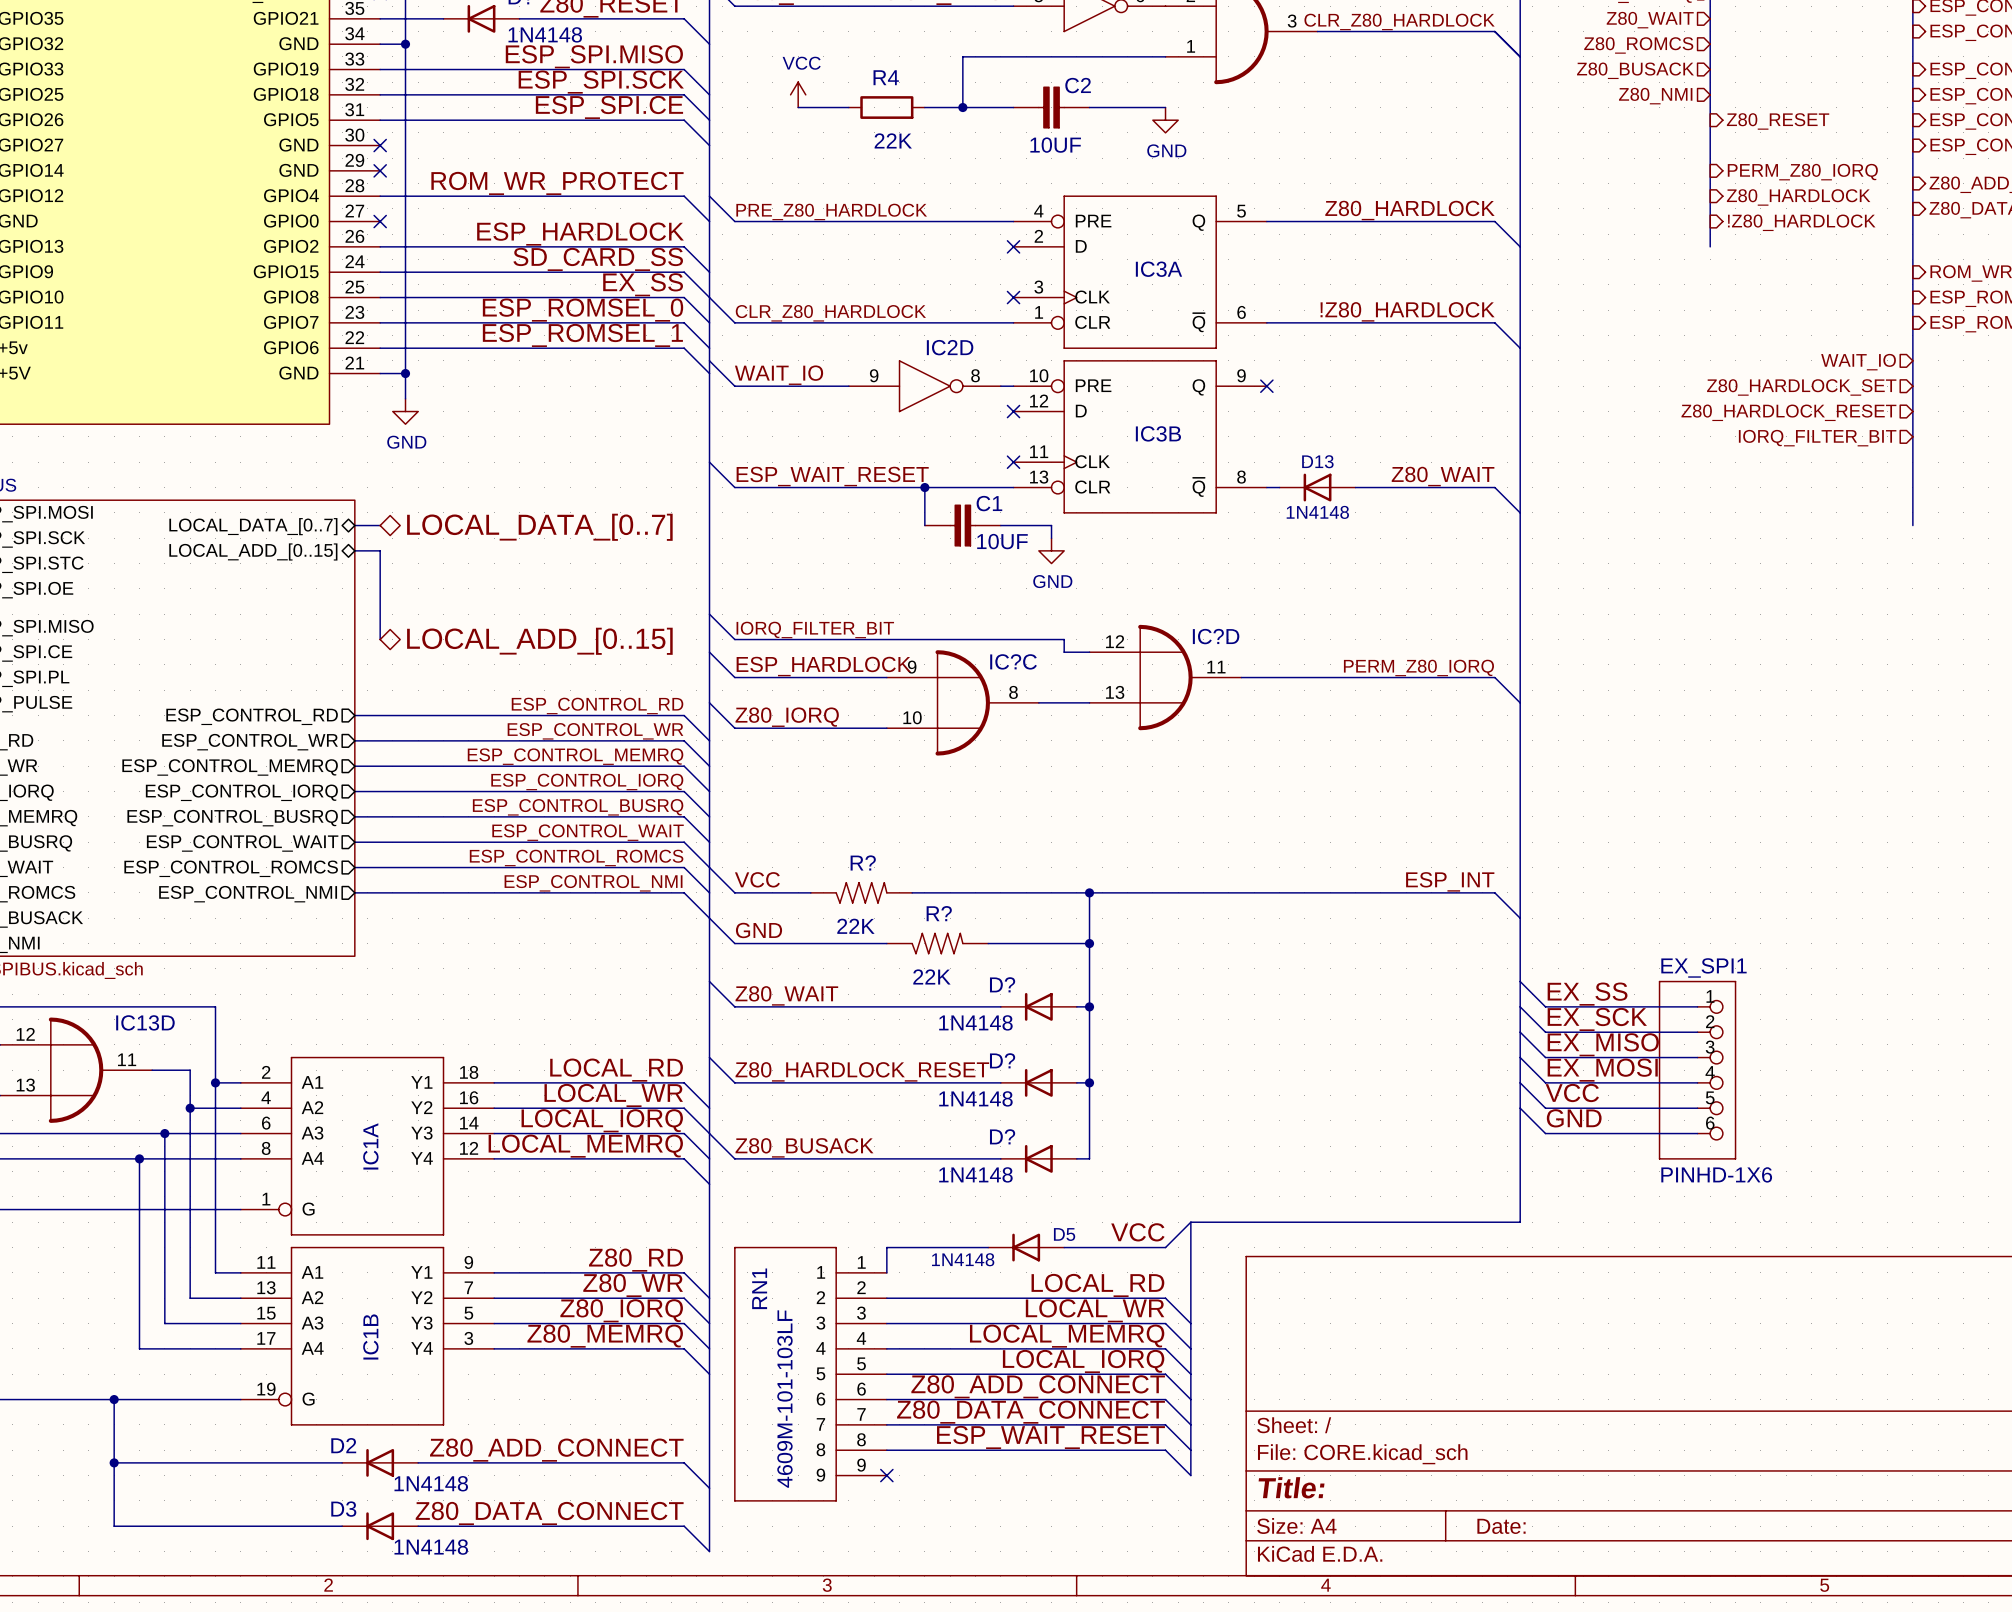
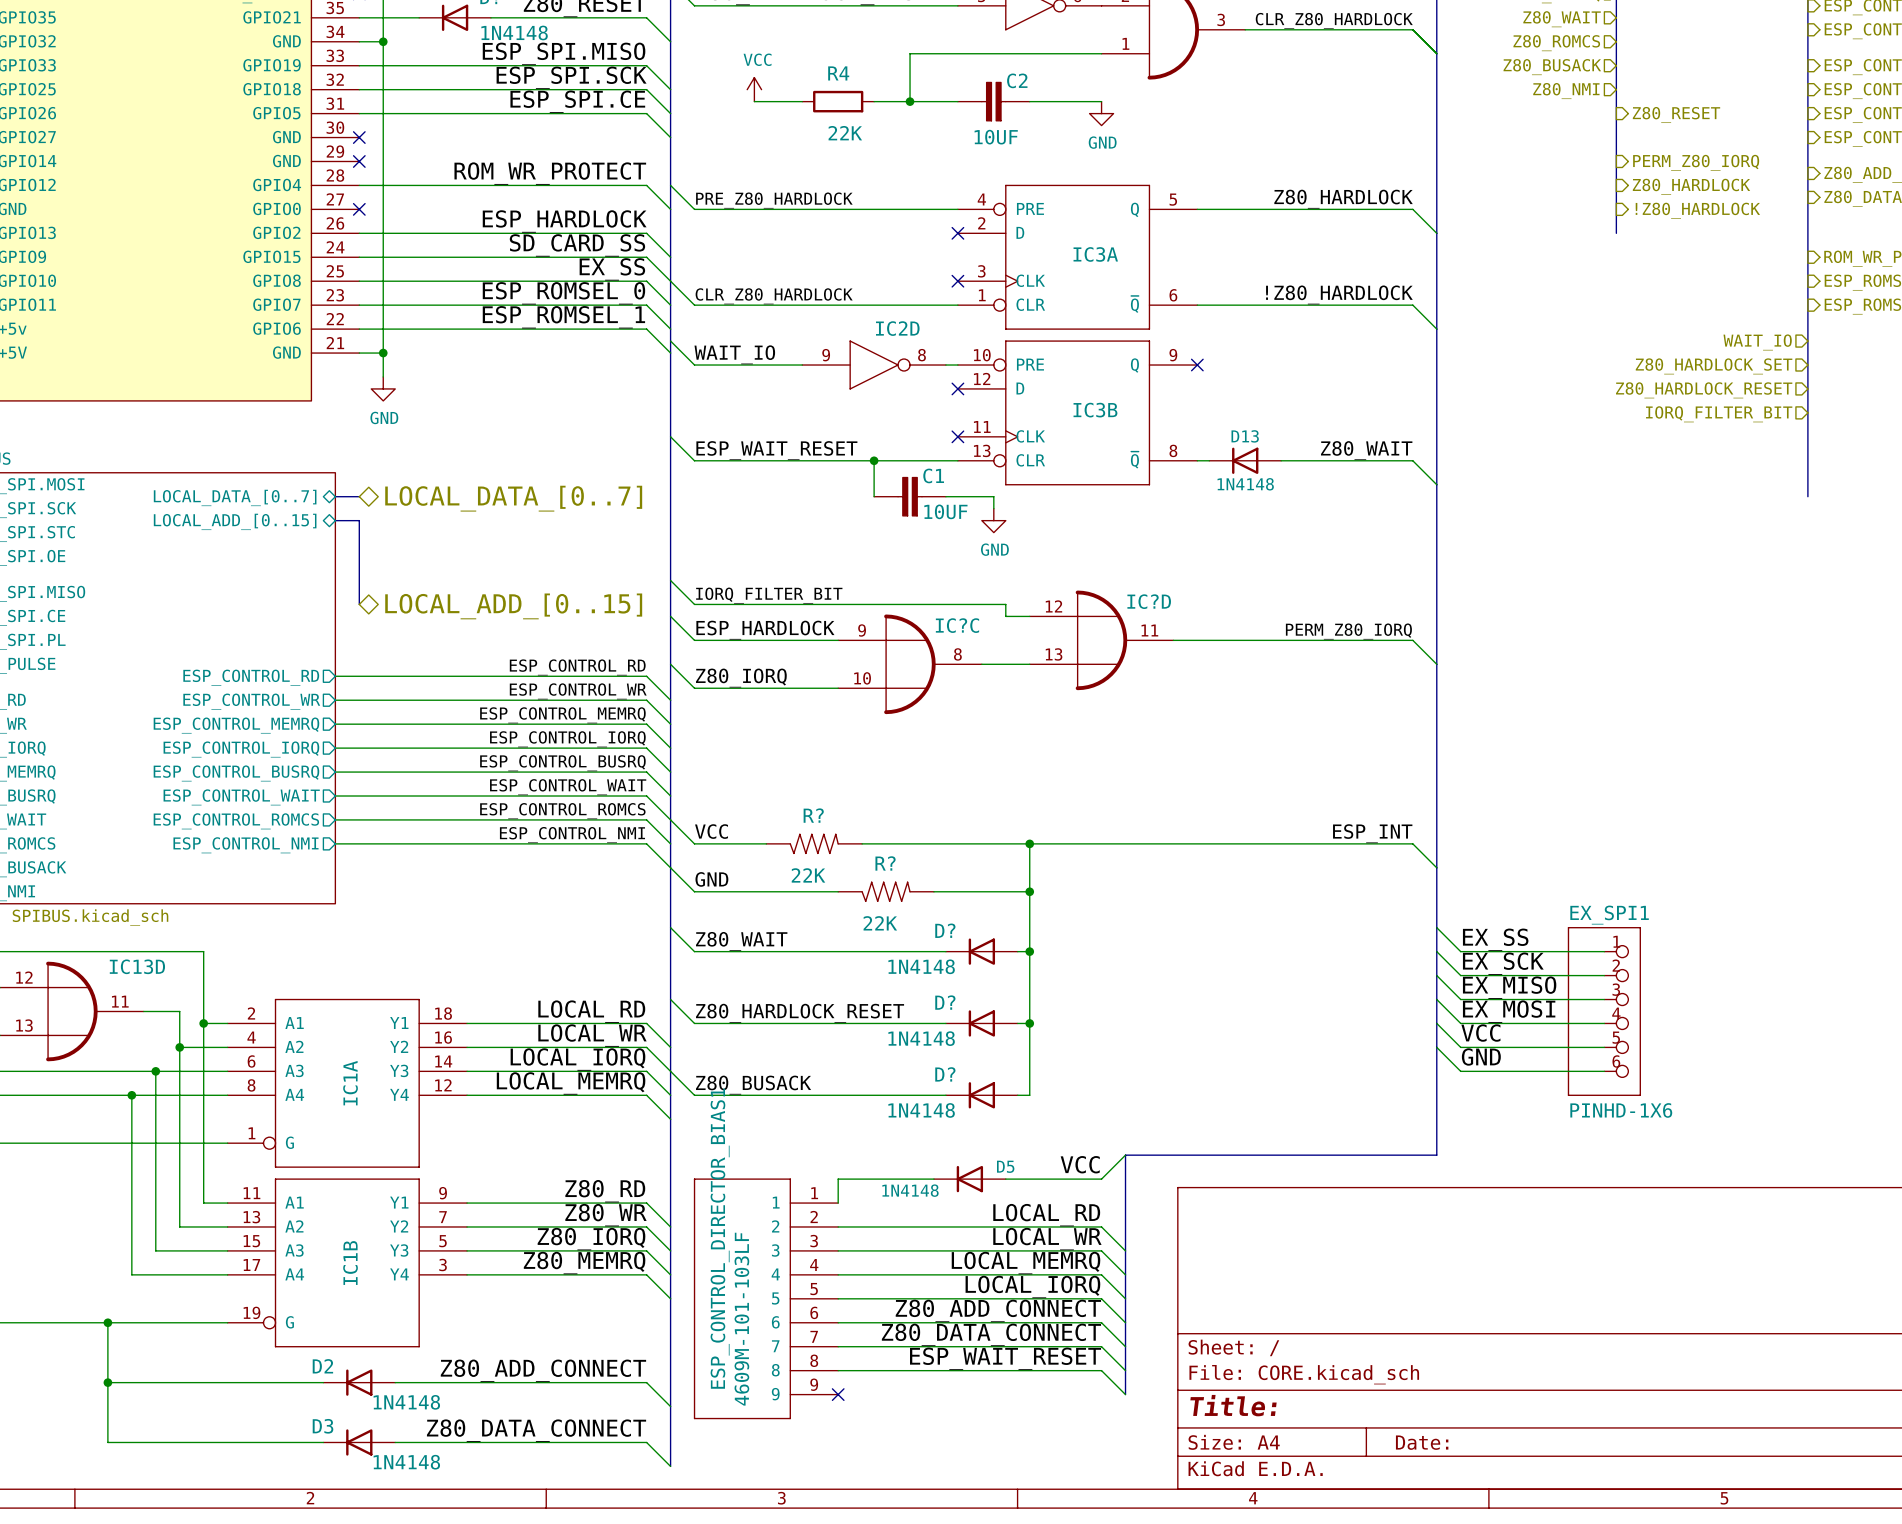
RN1 name: RN1 (759, 1288) -> ESP_CONTROL_DIRECTOR_BIAS1 (720, 1238)

